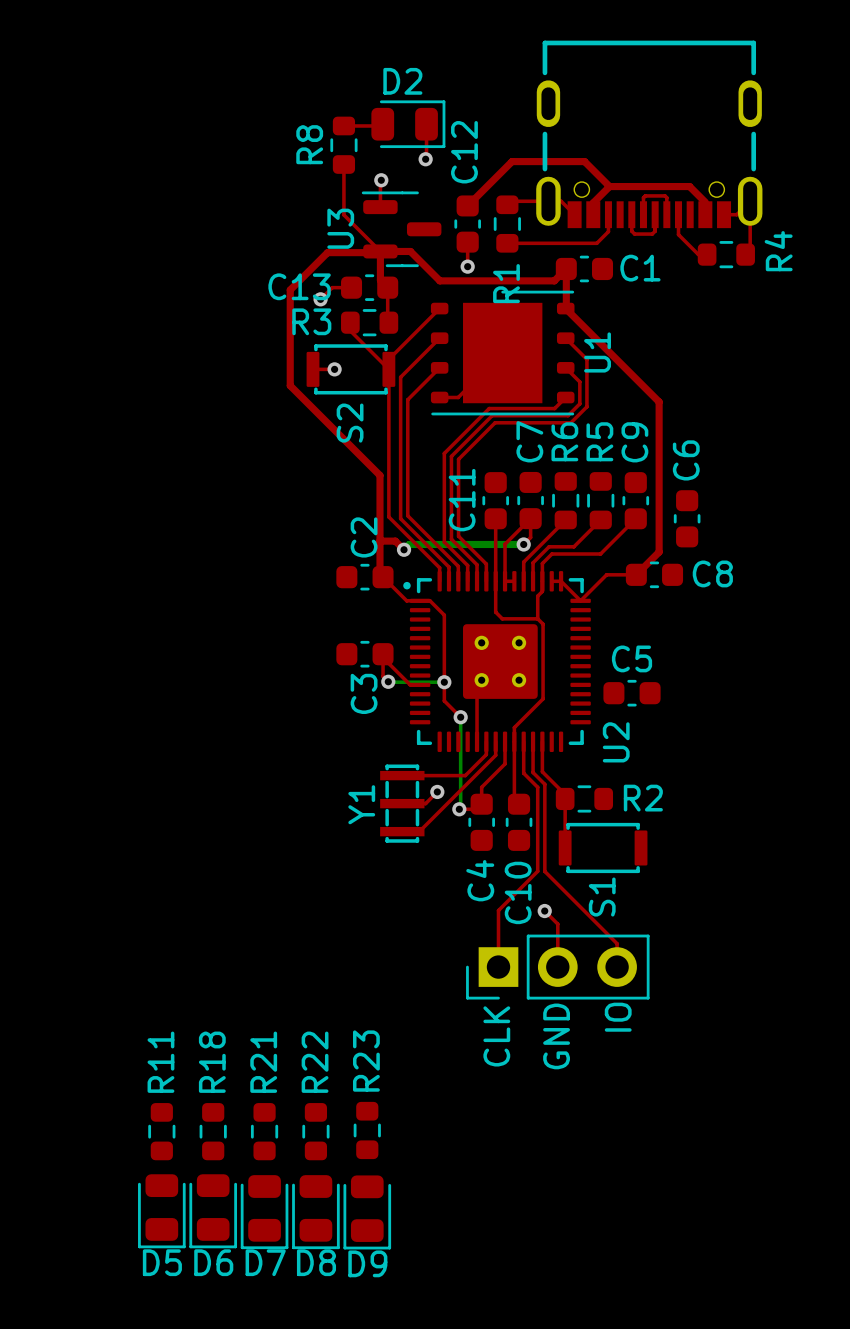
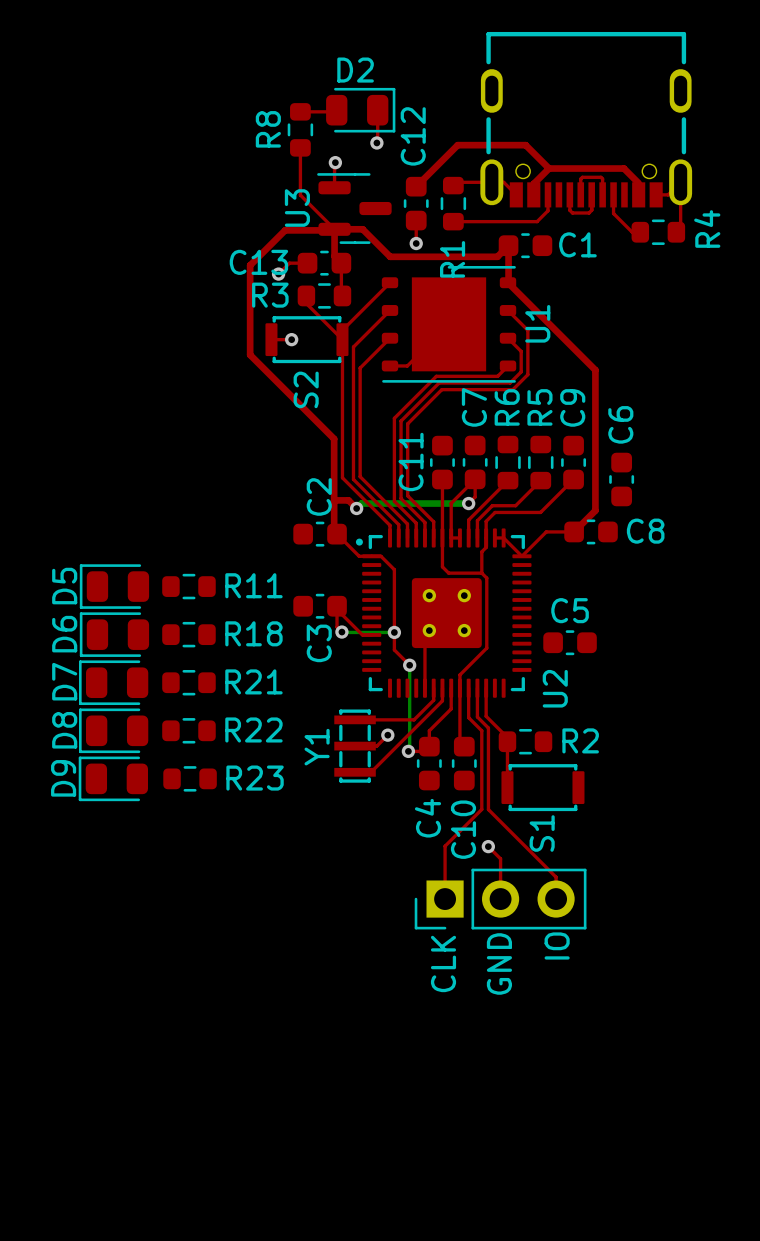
R23 rotation: 0° (367, 1130) -> 90° clockwise (190, 778)
R23 position: (367, 1130) -> (190, 778)
R11 rotation: 0° (161, 1131) -> 90° clockwise (188, 586)
R11 position: (161, 1131) -> (188, 586)
R18 rotation: 0° (213, 1131) -> 90° clockwise (188, 634)
R18 position: (213, 1131) -> (188, 634)
R21 rotation: 0° (264, 1131) -> 90° clockwise (188, 682)
R21 position: (264, 1131) -> (188, 682)
R22 rotation: 0° (315, 1131) -> 90° clockwise (188, 730)
R22 position: (315, 1131) -> (188, 730)
D5 rotation: 0° (161, 1211) -> 90° clockwise (114, 586)
D5 position: (161, 1211) -> (114, 586)
D6 rotation: 0° (213, 1211) -> 90° clockwise (114, 634)
D6 position: (213, 1211) -> (114, 634)
D7 rotation: 0° (264, 1212) -> 90° clockwise (113, 682)
D7 position: (264, 1212) -> (113, 682)
D8 rotation: 0° (315, 1212) -> 90° clockwise (113, 730)
D8 position: (315, 1212) -> (113, 730)
D9 rotation: 0° (367, 1212) -> 90° clockwise (113, 778)
D9 position: (367, 1212) -> (113, 778)

